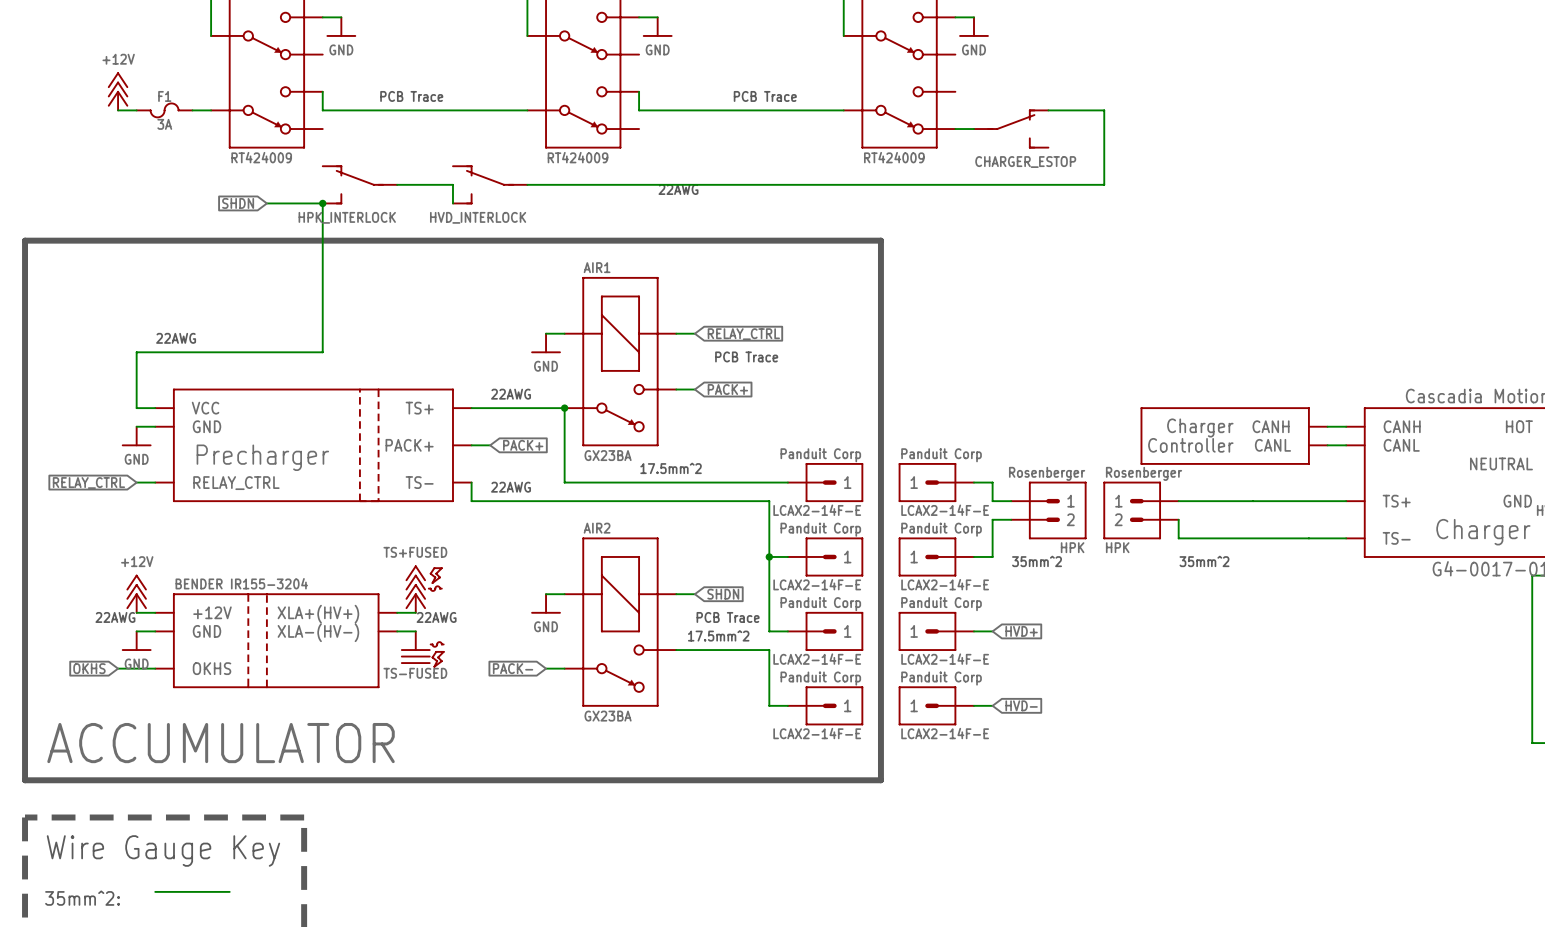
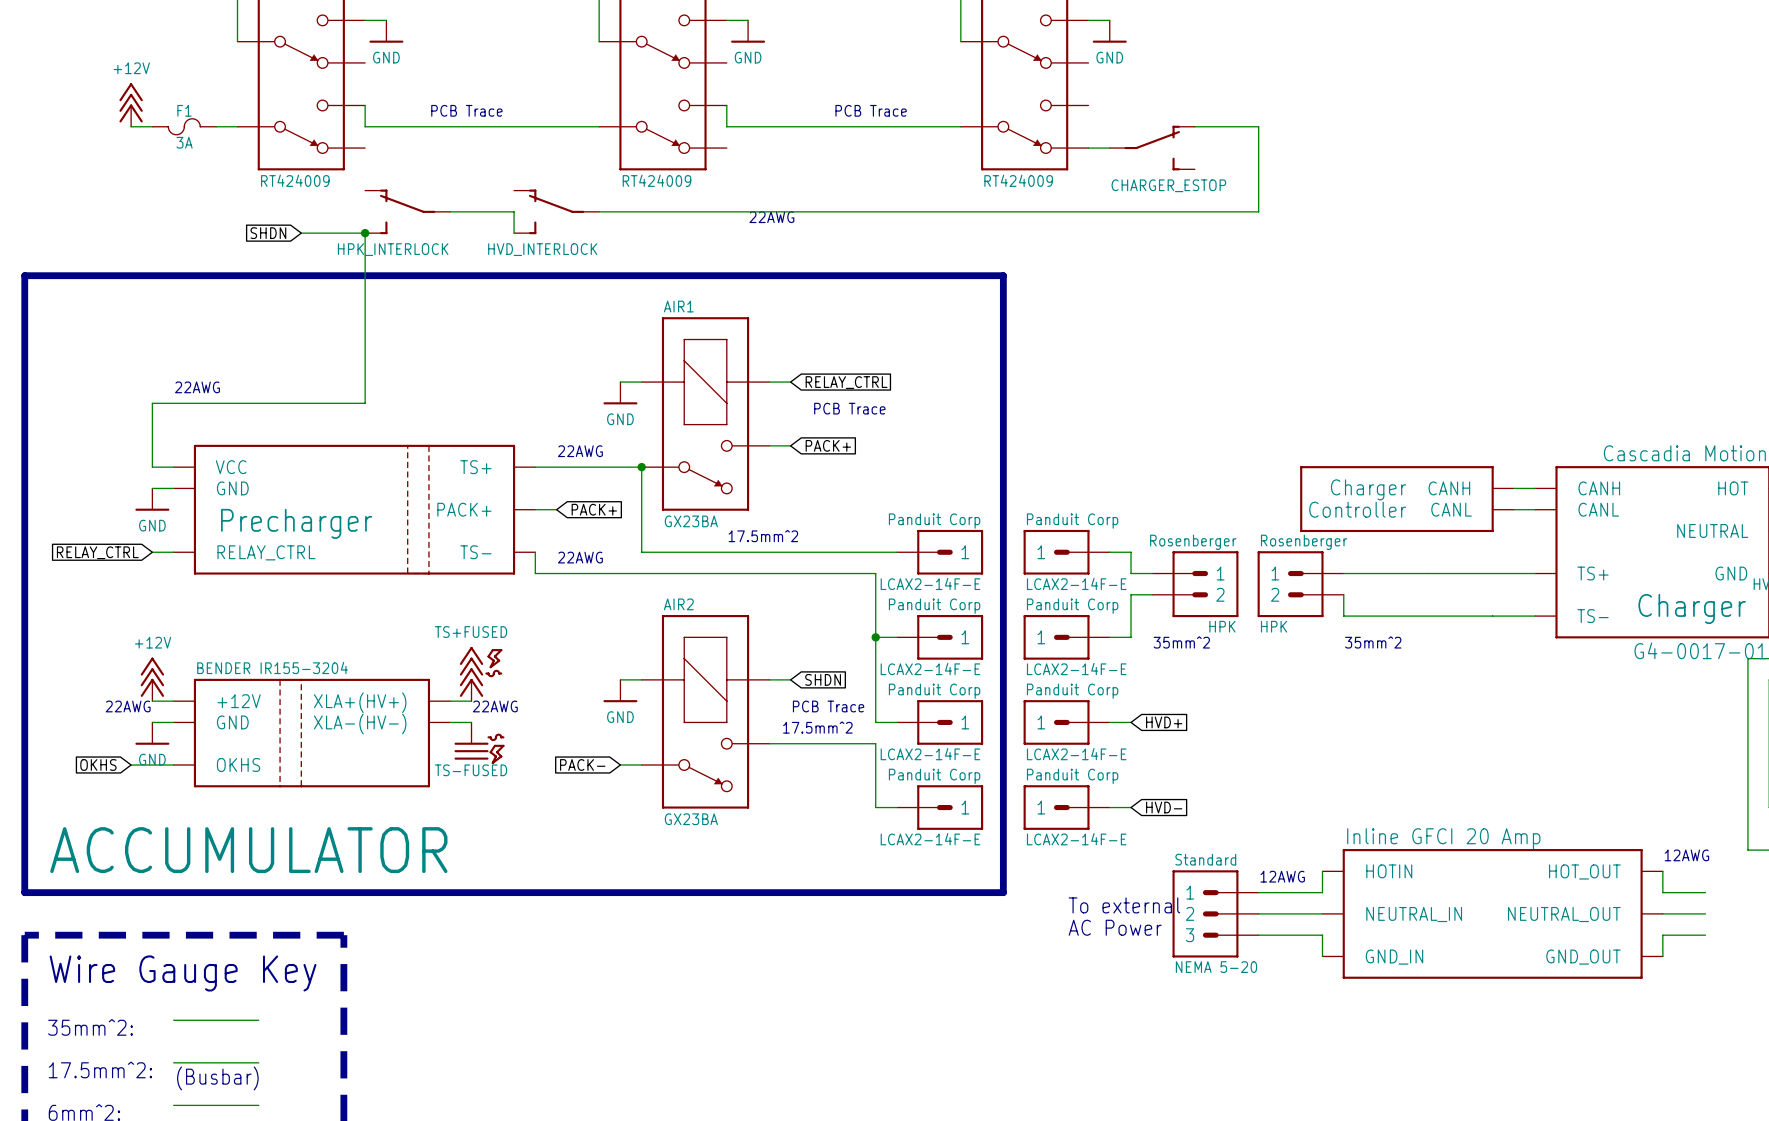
text: none -> 12AWG (1686, 855)
wire: none -> (1322, 871) (1322, 892) (1258, 892)
wire: none -> (1662, 871) (1662, 892) (1705, 892)
text: none -> 12AWG (1282, 876)
text: none -> To external (1124, 905)
part: none -> (1215, 913)
wire: none -> (1258, 913) (1322, 913)
part: none -> (1492, 913)
wire: none -> (1662, 913) (1705, 913)
text: none -> AC Power (1115, 927)
wire: none -> (1258, 935) (1322, 935) (1322, 956)
wire: none -> (1705, 935) (1662, 935) (1662, 956)

